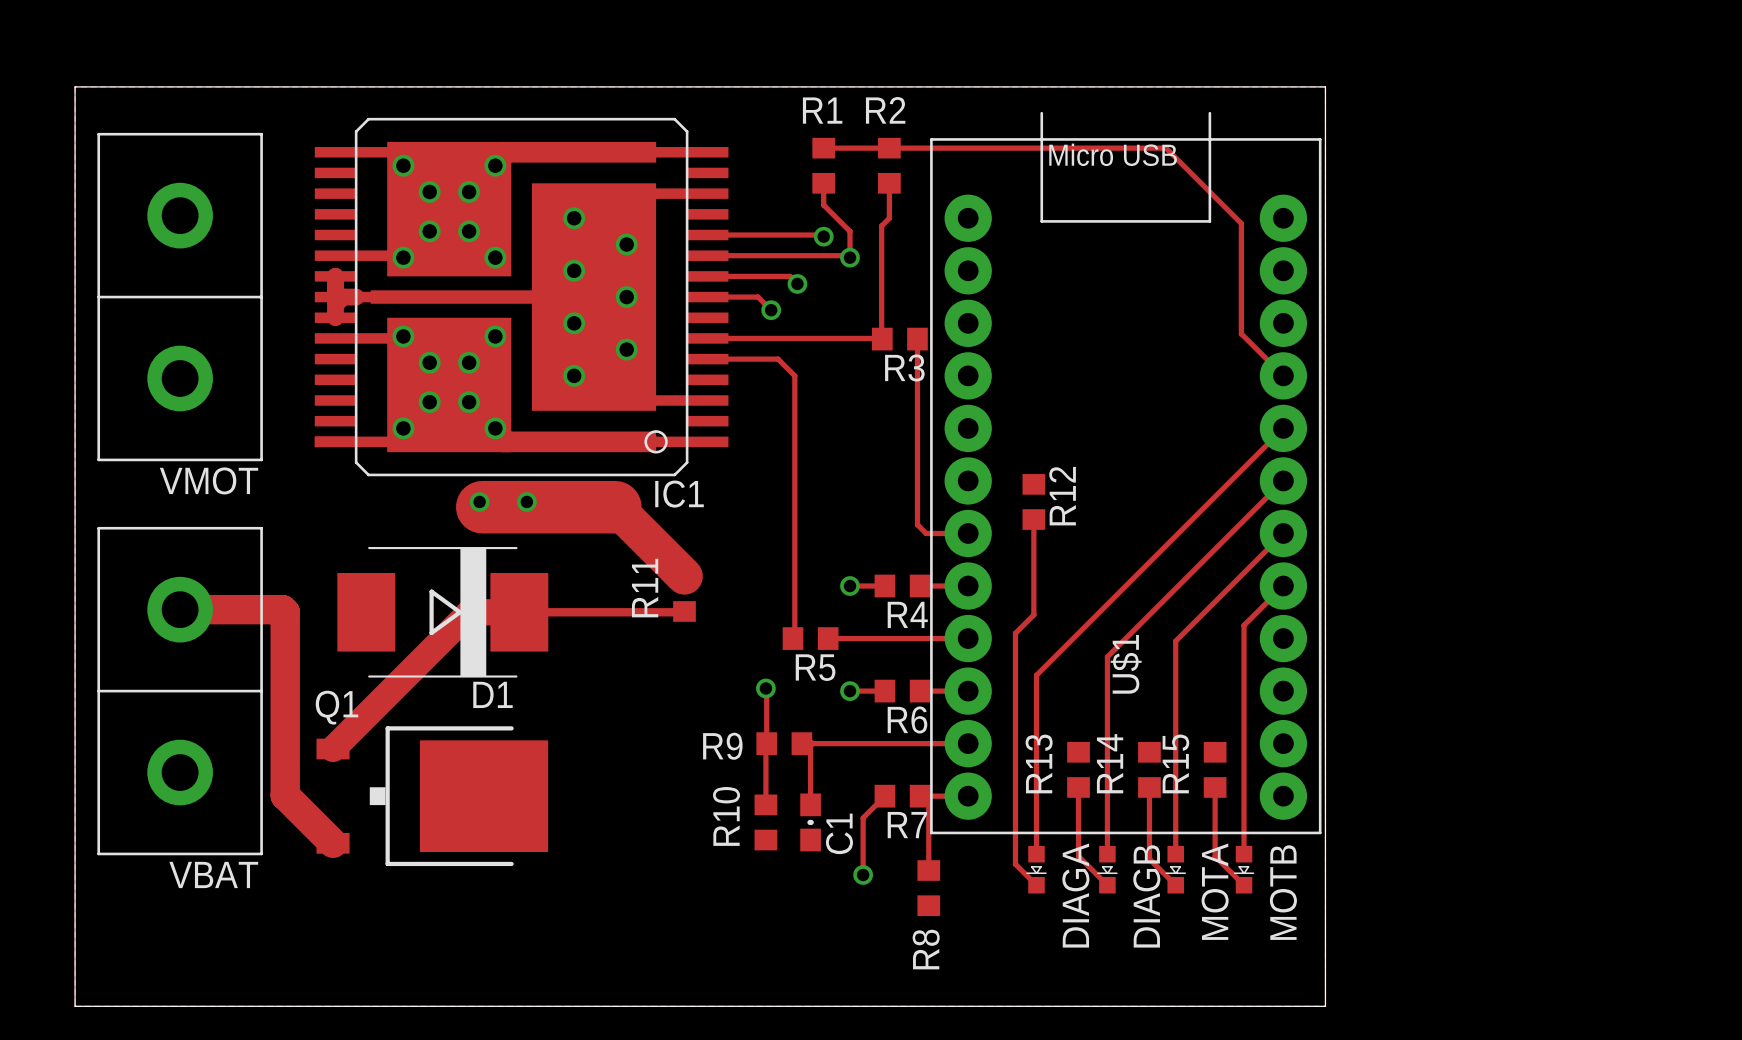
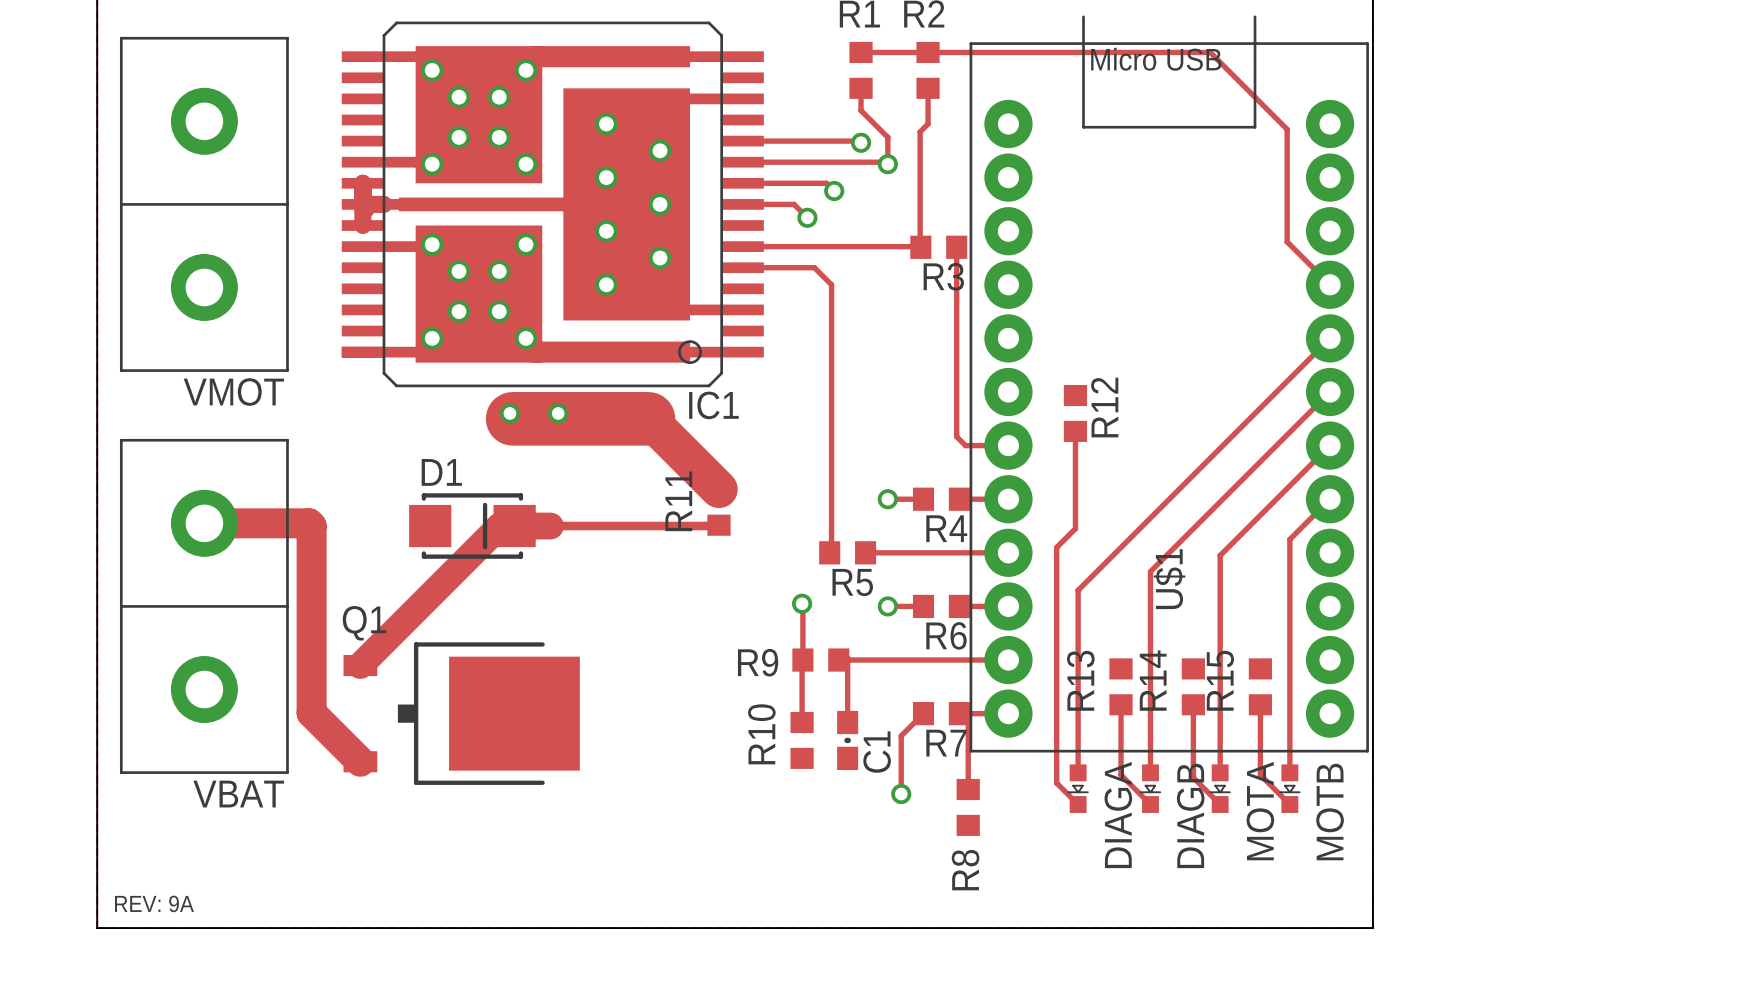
D1 footprint: [337, 547, 549, 678] -> [409, 493, 536, 559]
D1 name position: D1 (492, 694) -> D1 (441, 472)
text: none -> REV: 9A (154, 903)

